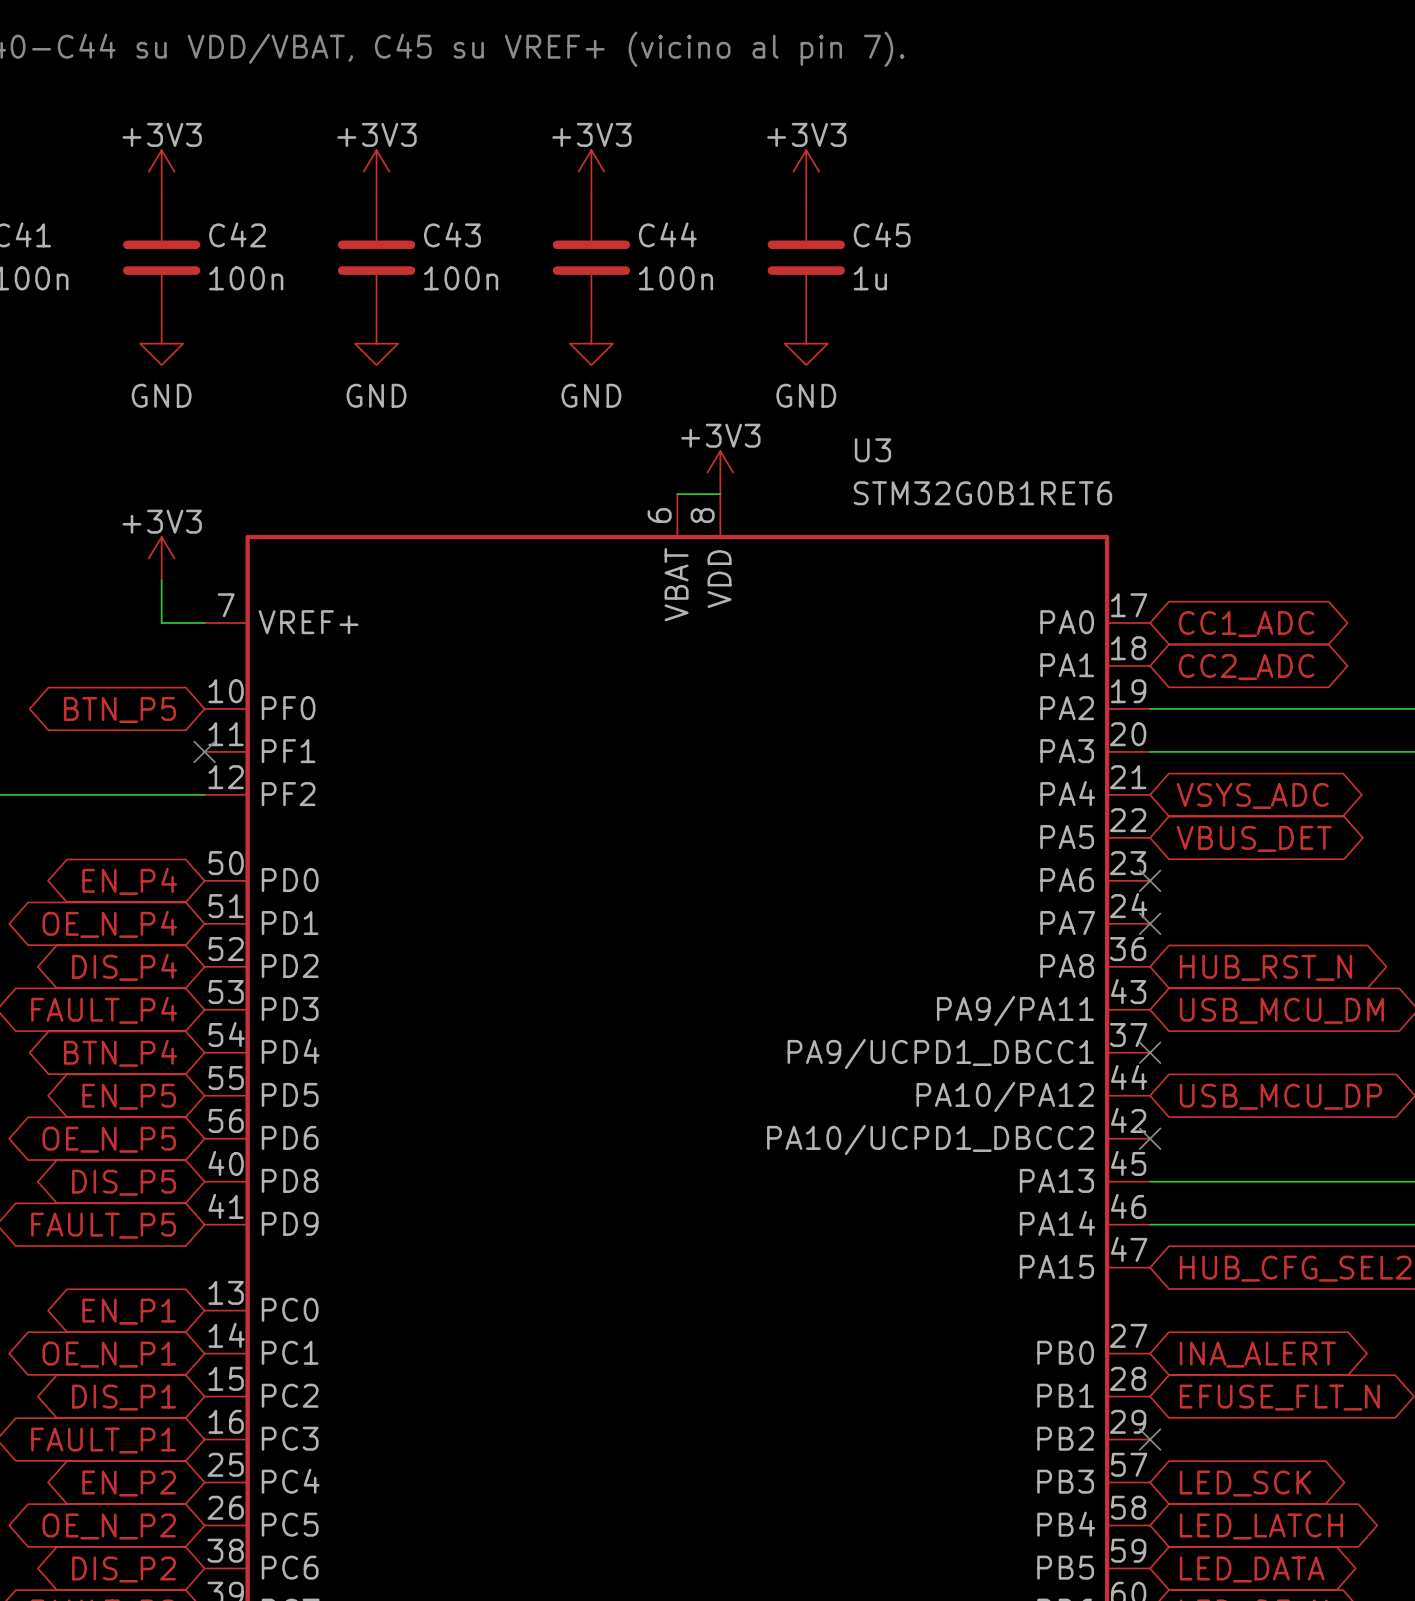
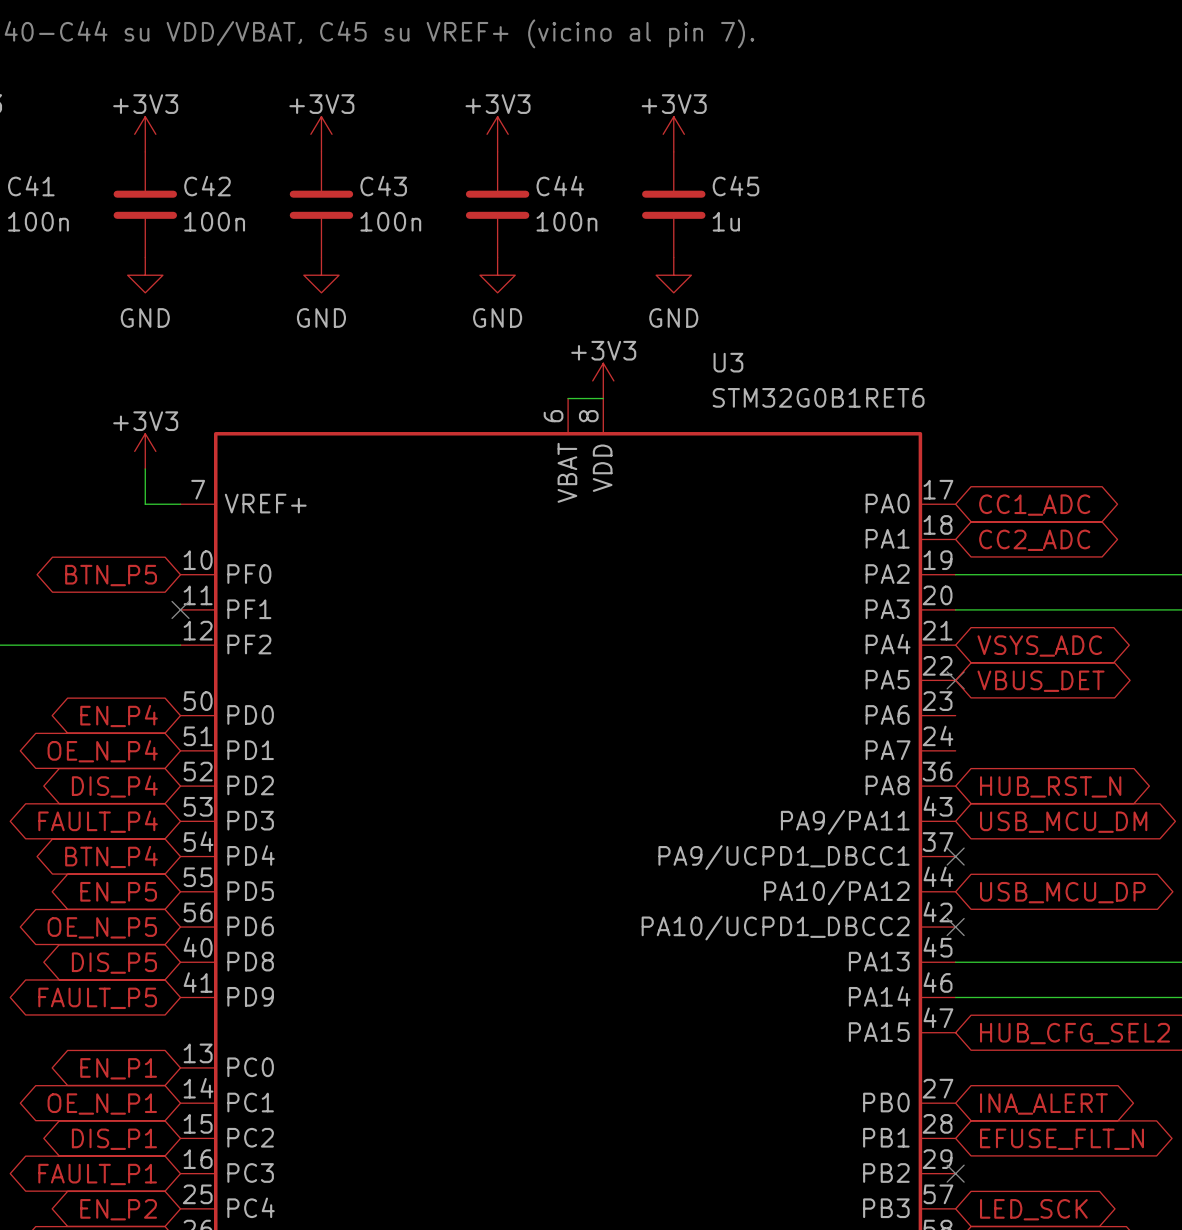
no-connect mark: none -> (955, 680)
no-connect mark: (1150, 880) -> none
no-connect mark: (1150, 923) -> none

